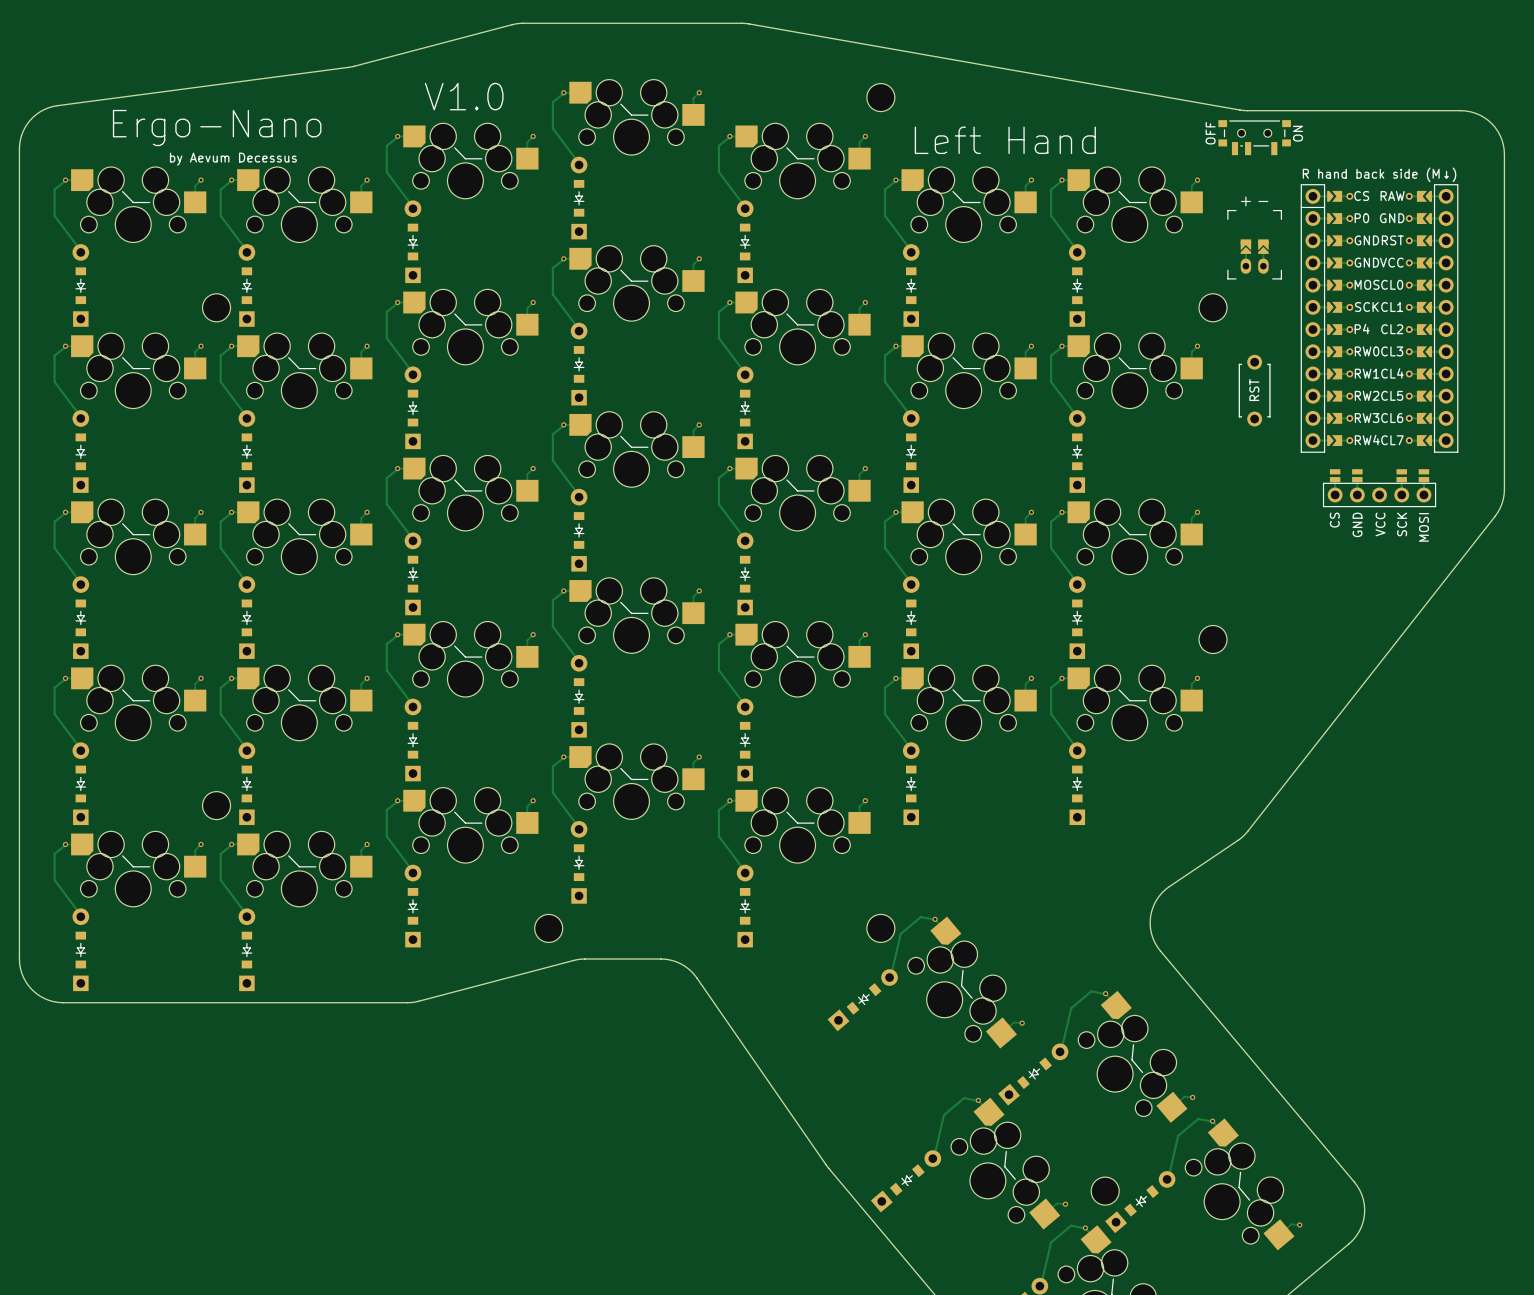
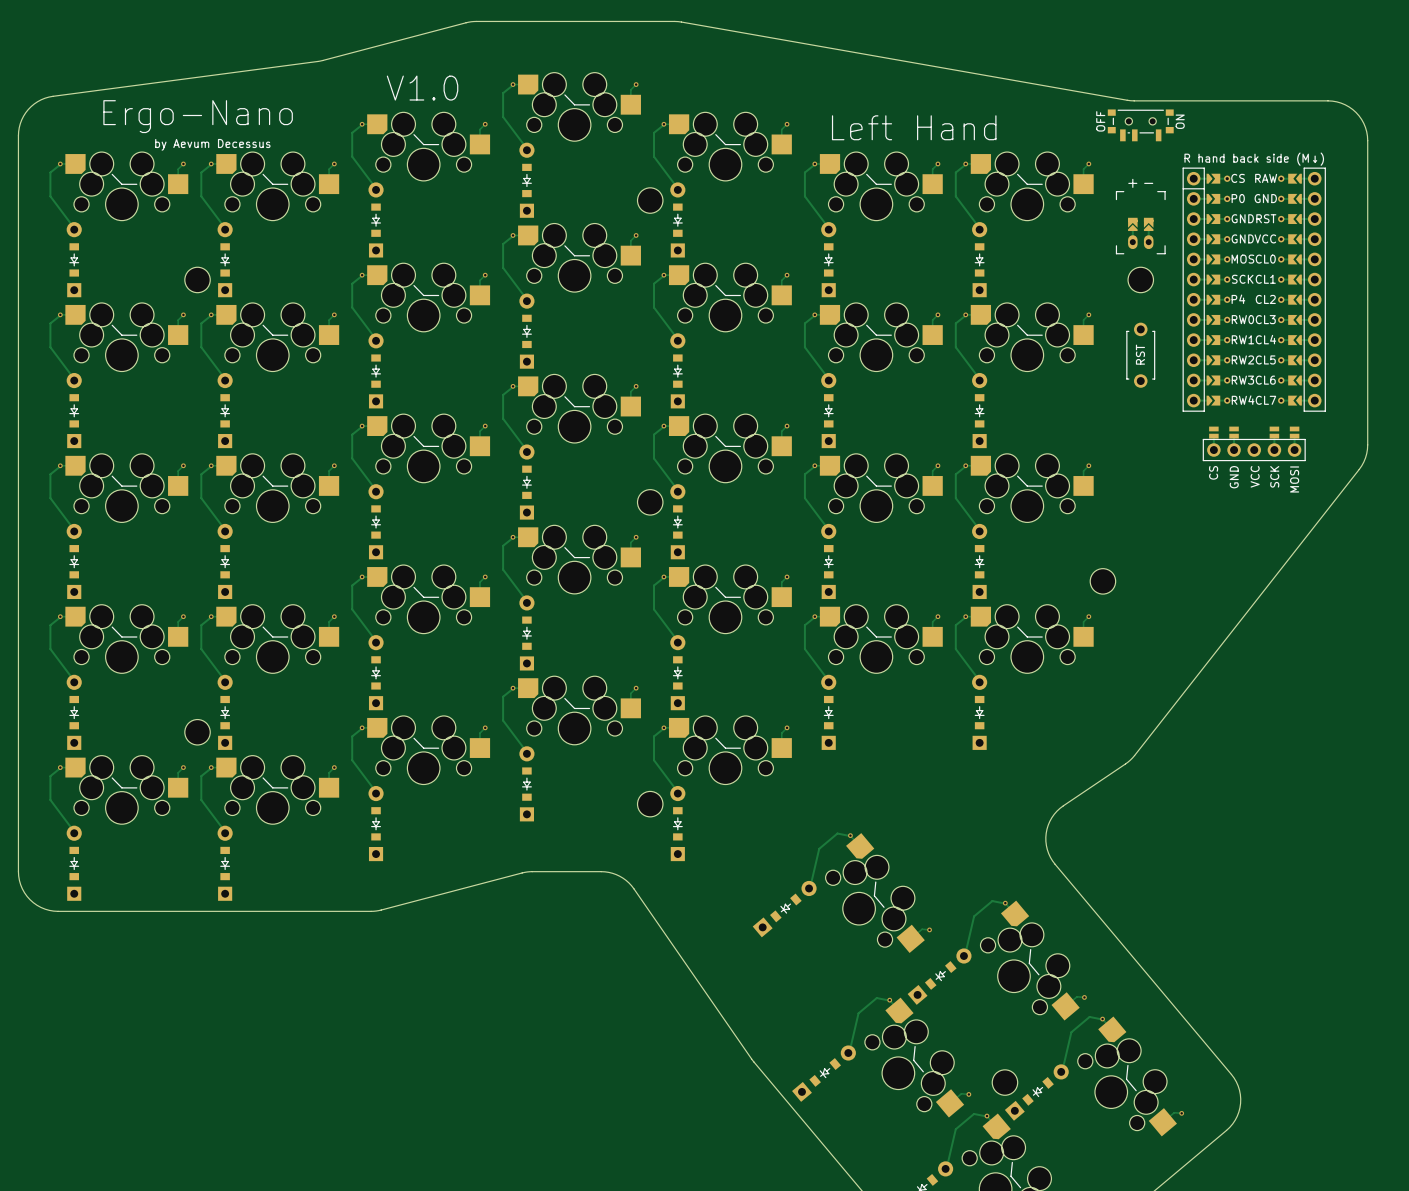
part position: (880, 97) -> (650, 200)
part position: (1213, 307) -> (1140, 279)
part: none -> (650, 502)
part: none -> (650, 804)
part: (548, 928) -> none
part: (880, 928) -> none

